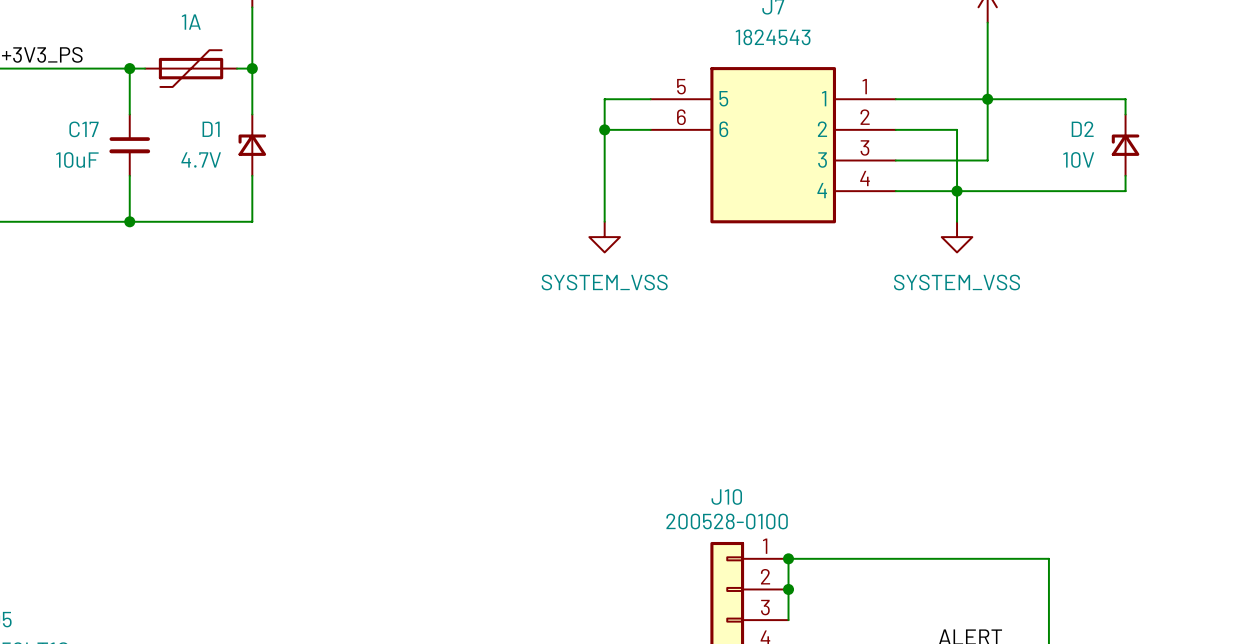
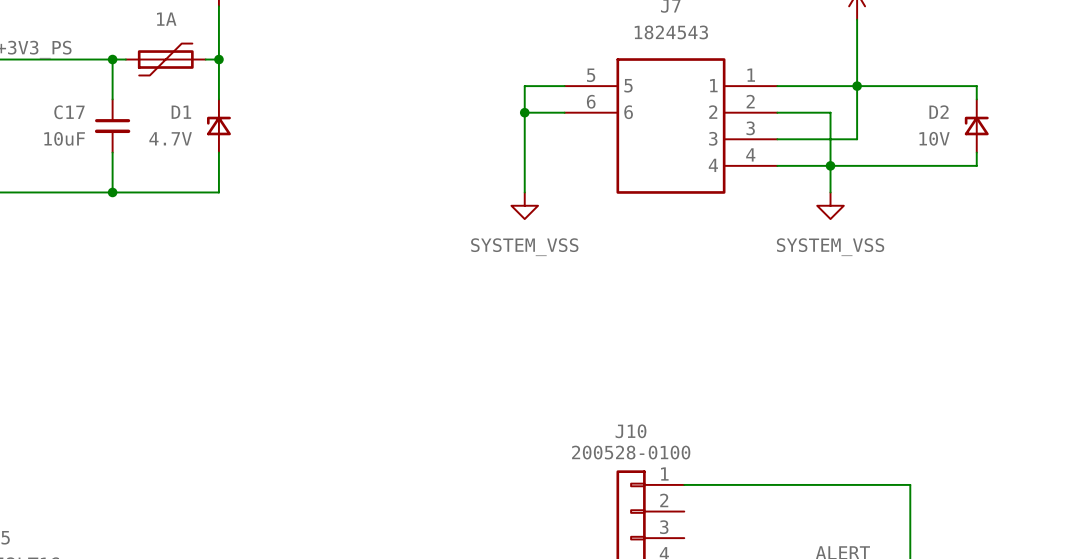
wire: (788, 558) (788, 620) -> none
junction: (788, 558) -> none
junction: (788, 589) -> none

